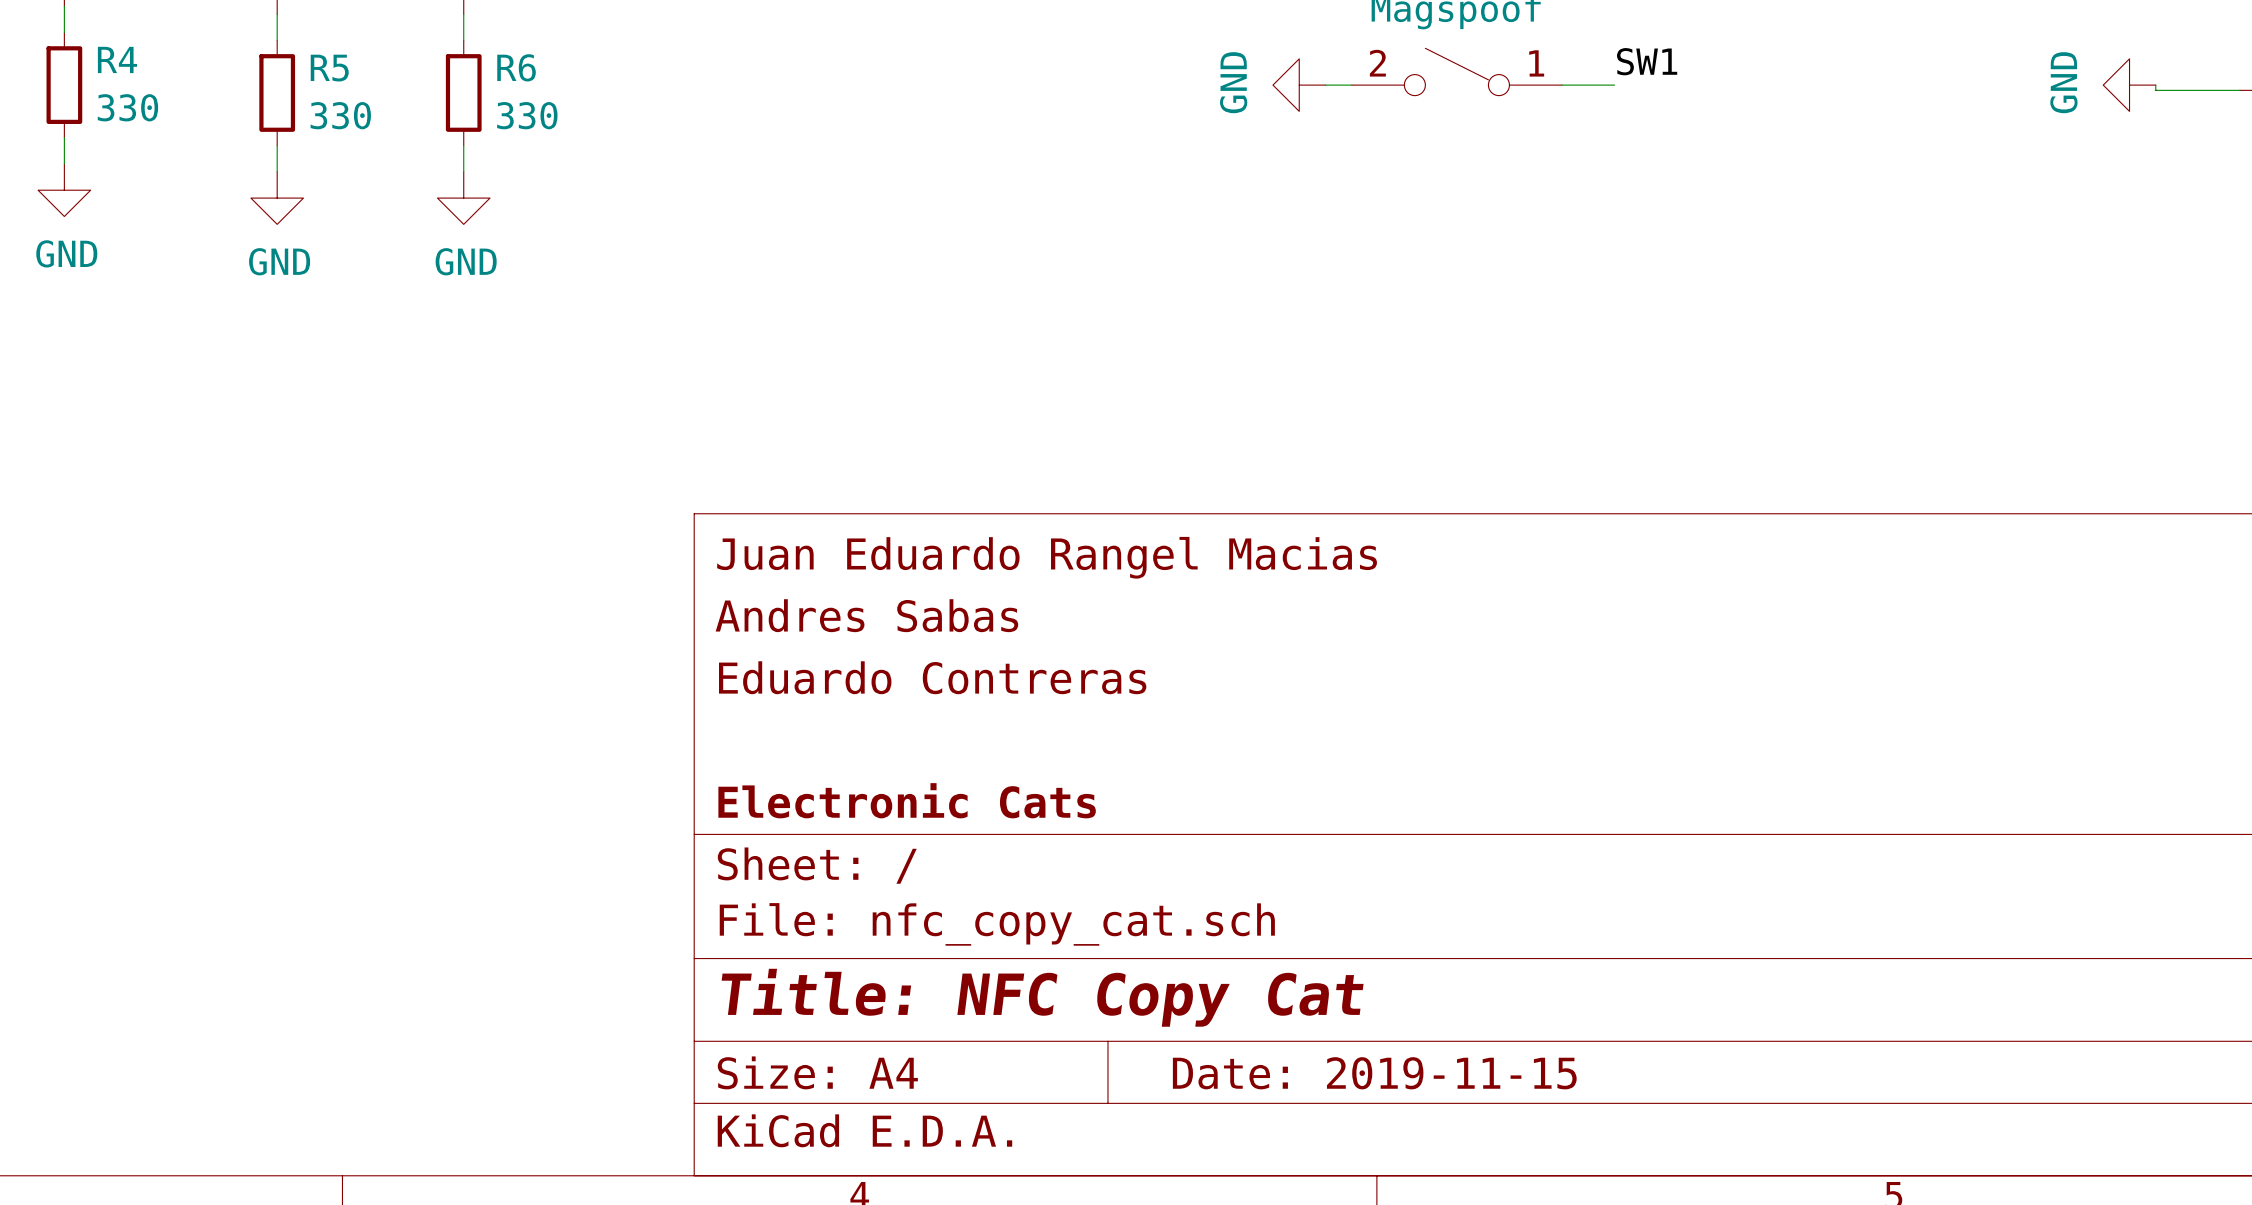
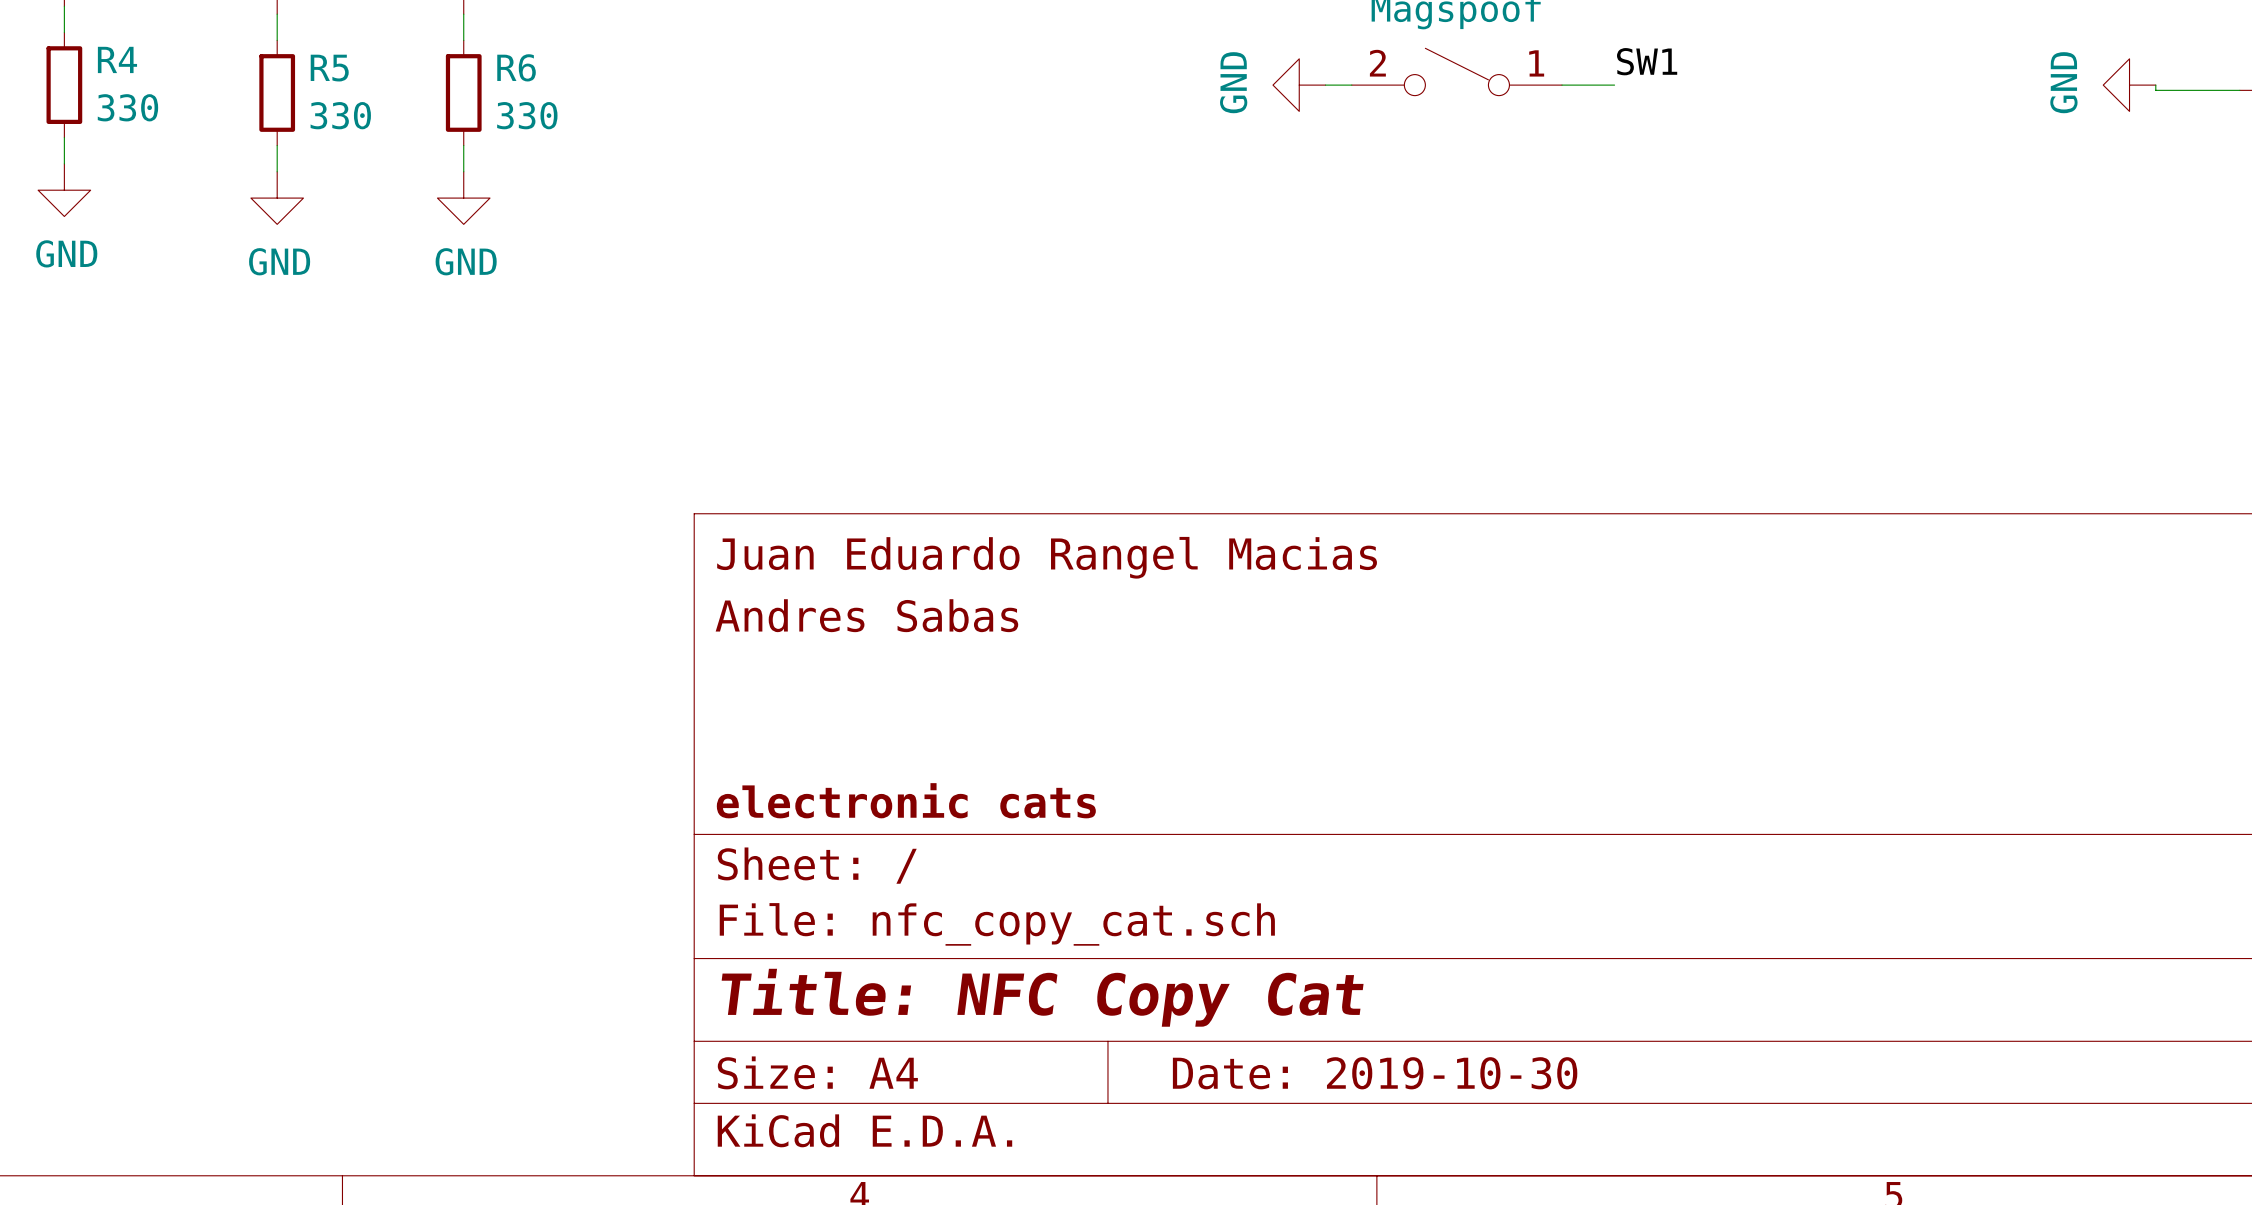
title block: Eduardo Contreras (932, 677) -> none
title block: Electronic Cats (907, 800) -> electronic cats (906, 800)
title block: Date: 2019-11-15 (1374, 1073) -> Date: 2019-10-30 (1375, 1073)

